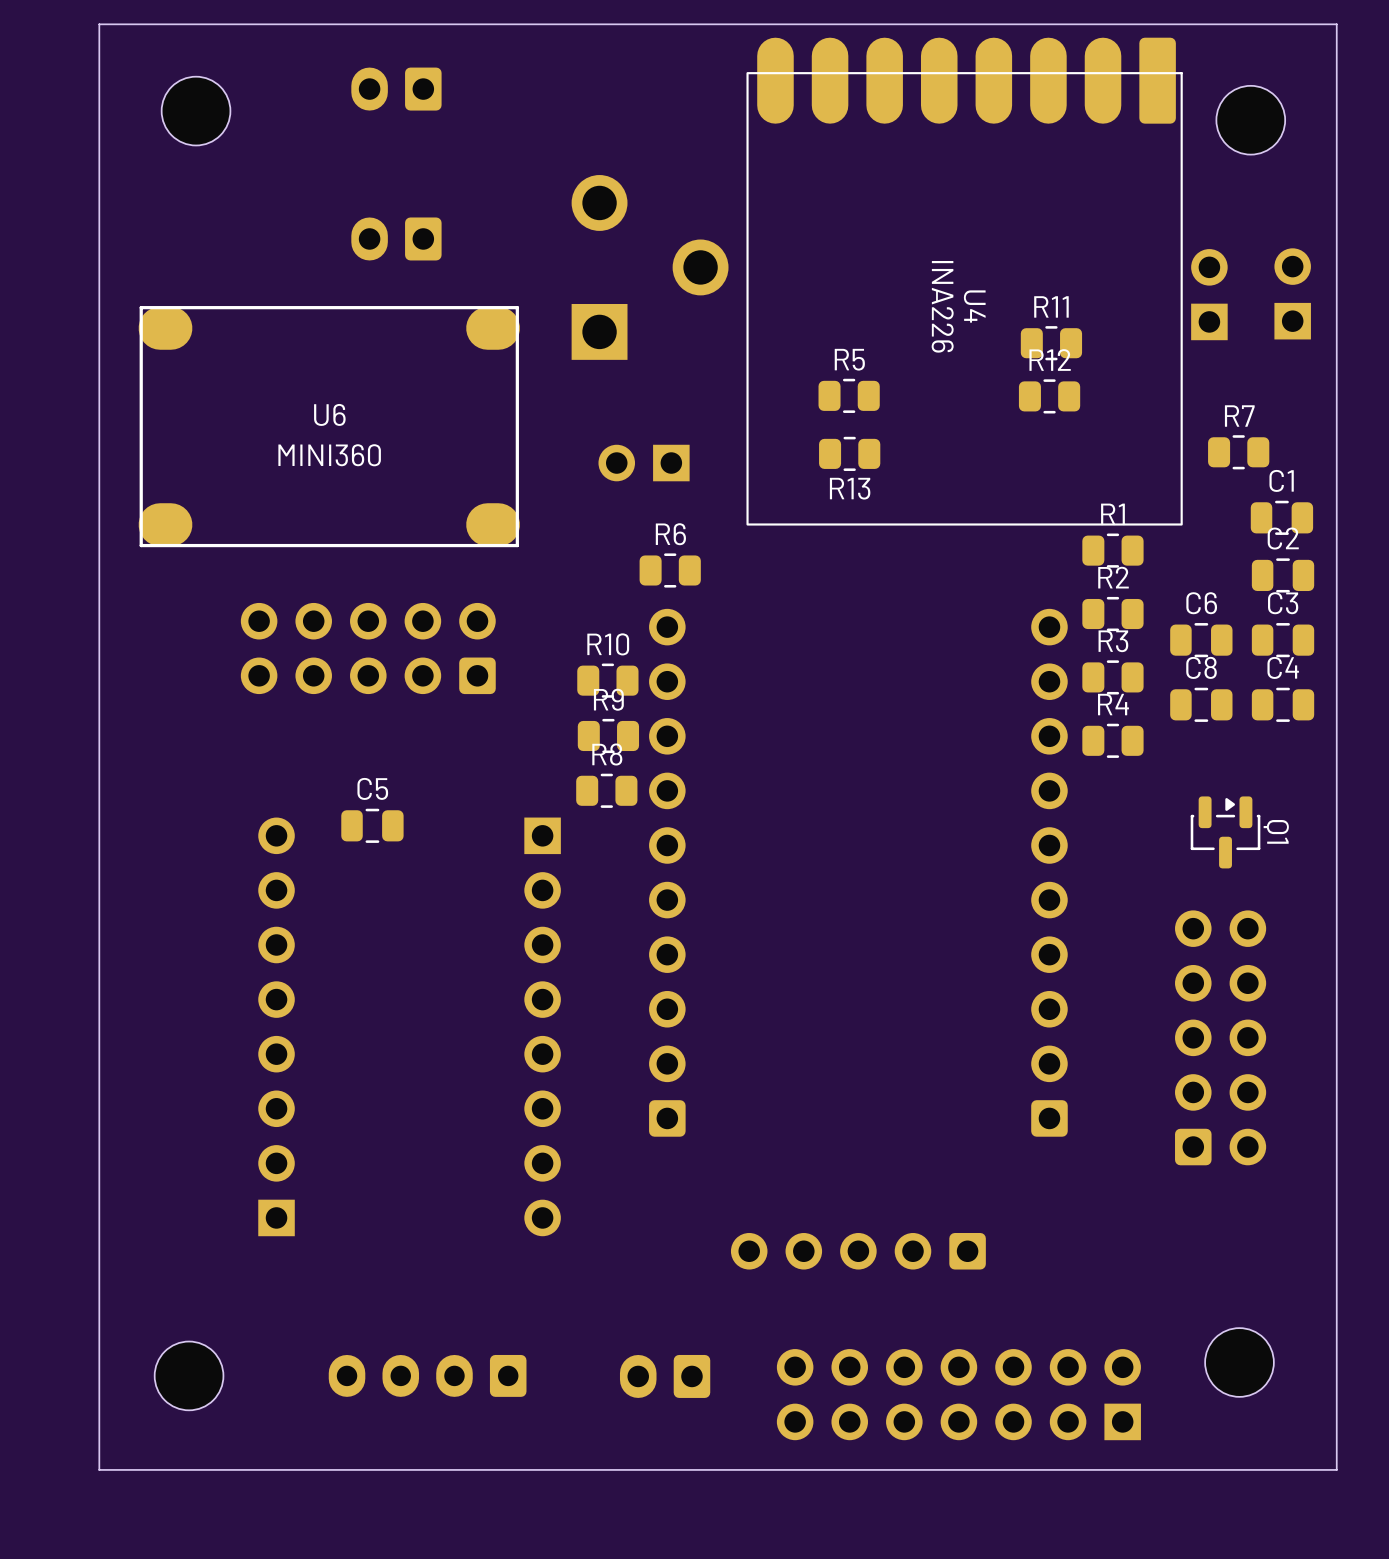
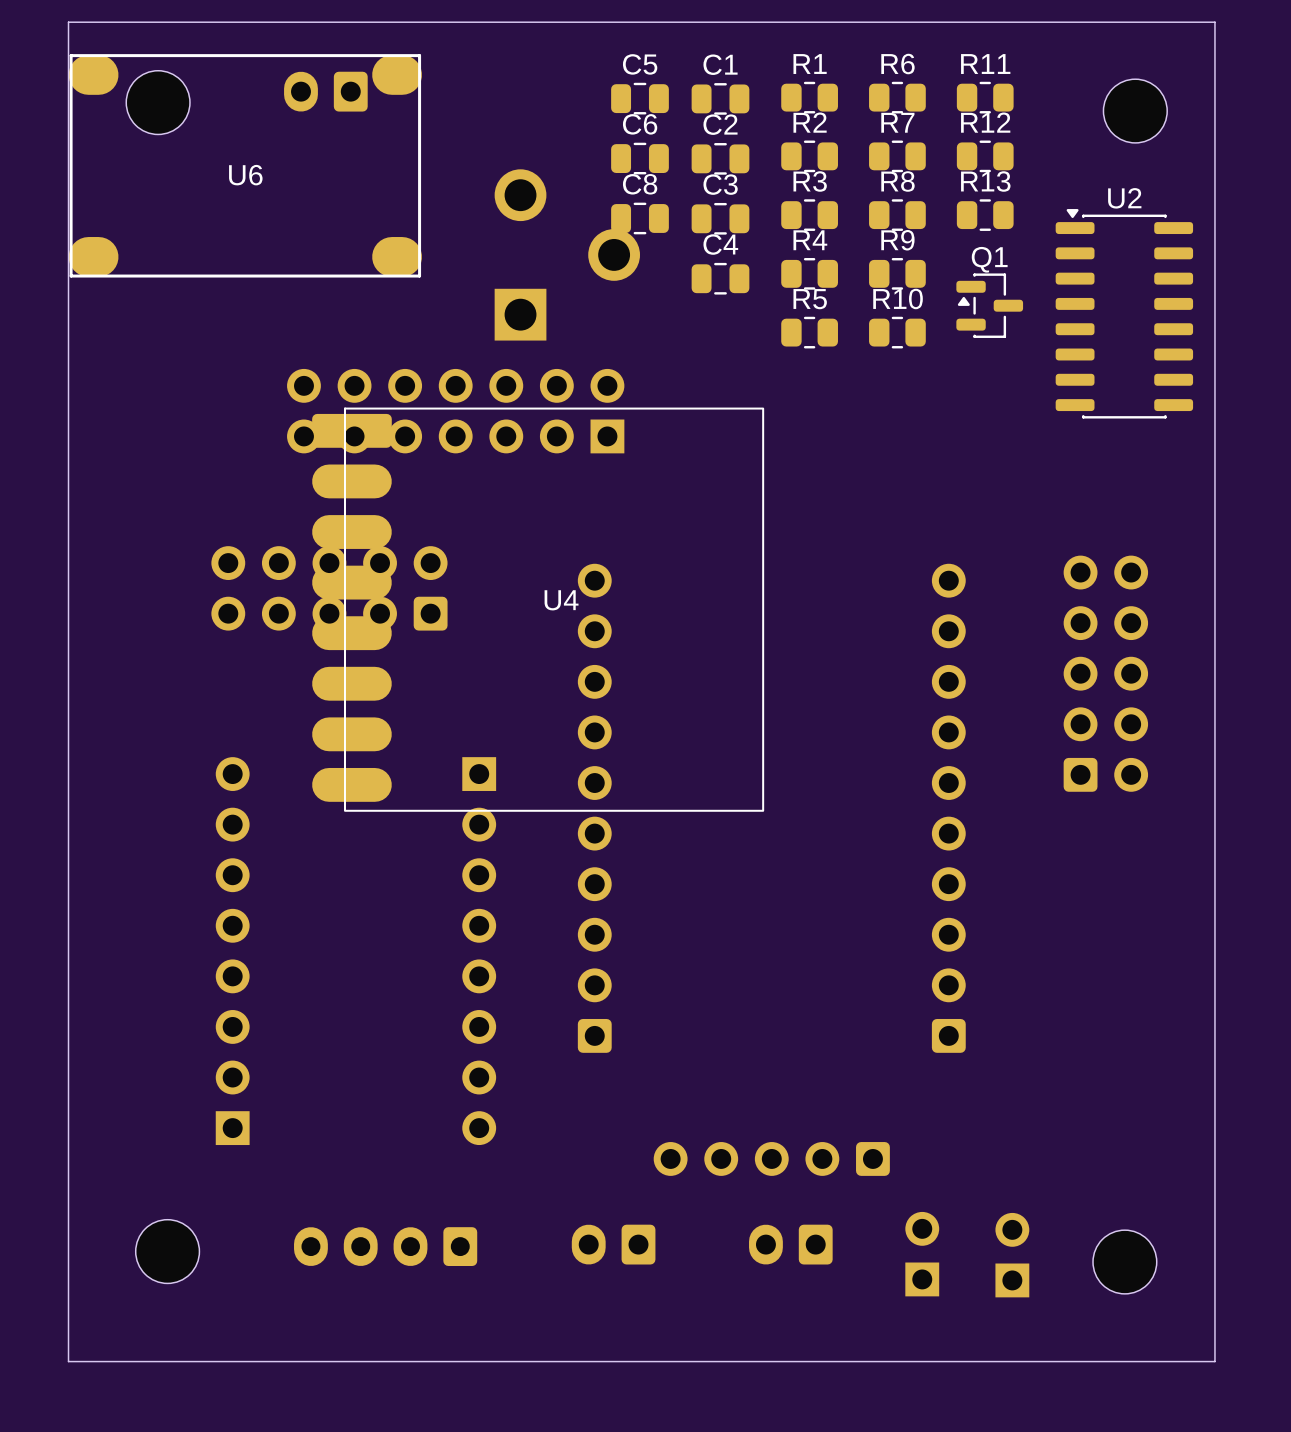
part position: (396, 89) -> (325, 91)
part: (396, 238) -> none
part position: (650, 267) -> (567, 254)
U4 rotation: 0° (964, 281) -> 90° counterclockwise (538, 609)
U4 position: (964, 281) -> (538, 609)
part: (1292, 293) -> none
part: (1209, 294) -> none
U4 value: INA226 (942, 306) -> none
U2: none -> (1124, 313)
R11 position: (1051, 343) -> (985, 97)
R5 position: (849, 395) -> (809, 332)
R12 position: (1049, 396) -> (985, 156)
U6 name position: U6 (329, 414) -> U6 (245, 175)
U6 position: (329, 426) -> (245, 165)
part: none -> (455, 411)
R7 position: (1238, 452) -> (897, 156)
R13 position: (849, 453) -> (985, 215)
U6 value: MINI360 (329, 455) -> none
part: (644, 463) -> none
R13 name position: R13 (850, 488) -> R13 (985, 181)
C1 position: (1281, 517) -> (720, 98)
R1 position: (1112, 550) -> (809, 97)
R6 position: (670, 570) -> (897, 97)
C2 position: (1283, 575) -> (720, 158)
R2 position: (1112, 614) -> (809, 156)
C6 position: (1201, 640) -> (640, 158)
C3 position: (1283, 640) -> (720, 218)
part position: (368, 648) -> (329, 588)
R3 position: (1112, 677) -> (809, 215)
R10 position: (607, 680) -> (897, 332)
C8 position: (1201, 704) -> (640, 218)
C4 position: (1283, 704) -> (720, 278)
R9 position: (608, 735) -> (897, 273)
R4 position: (1112, 740) -> (809, 273)
R8 position: (606, 790) -> (897, 215)
C5 position: (372, 825) -> (640, 98)
Q1 rotation: 0° (1225, 832) -> 90° counterclockwise (989, 305)
Q1 position: (1225, 832) -> (989, 305)
part position: (1220, 1037) -> (1105, 673)
part: none -> (790, 1244)
part: none -> (922, 1254)
part: none -> (1012, 1255)
part position: (189, 1375) -> (167, 1251)
part position: (427, 1375) -> (385, 1246)
part position: (665, 1376) -> (613, 1244)
part: (958, 1394) -> none

